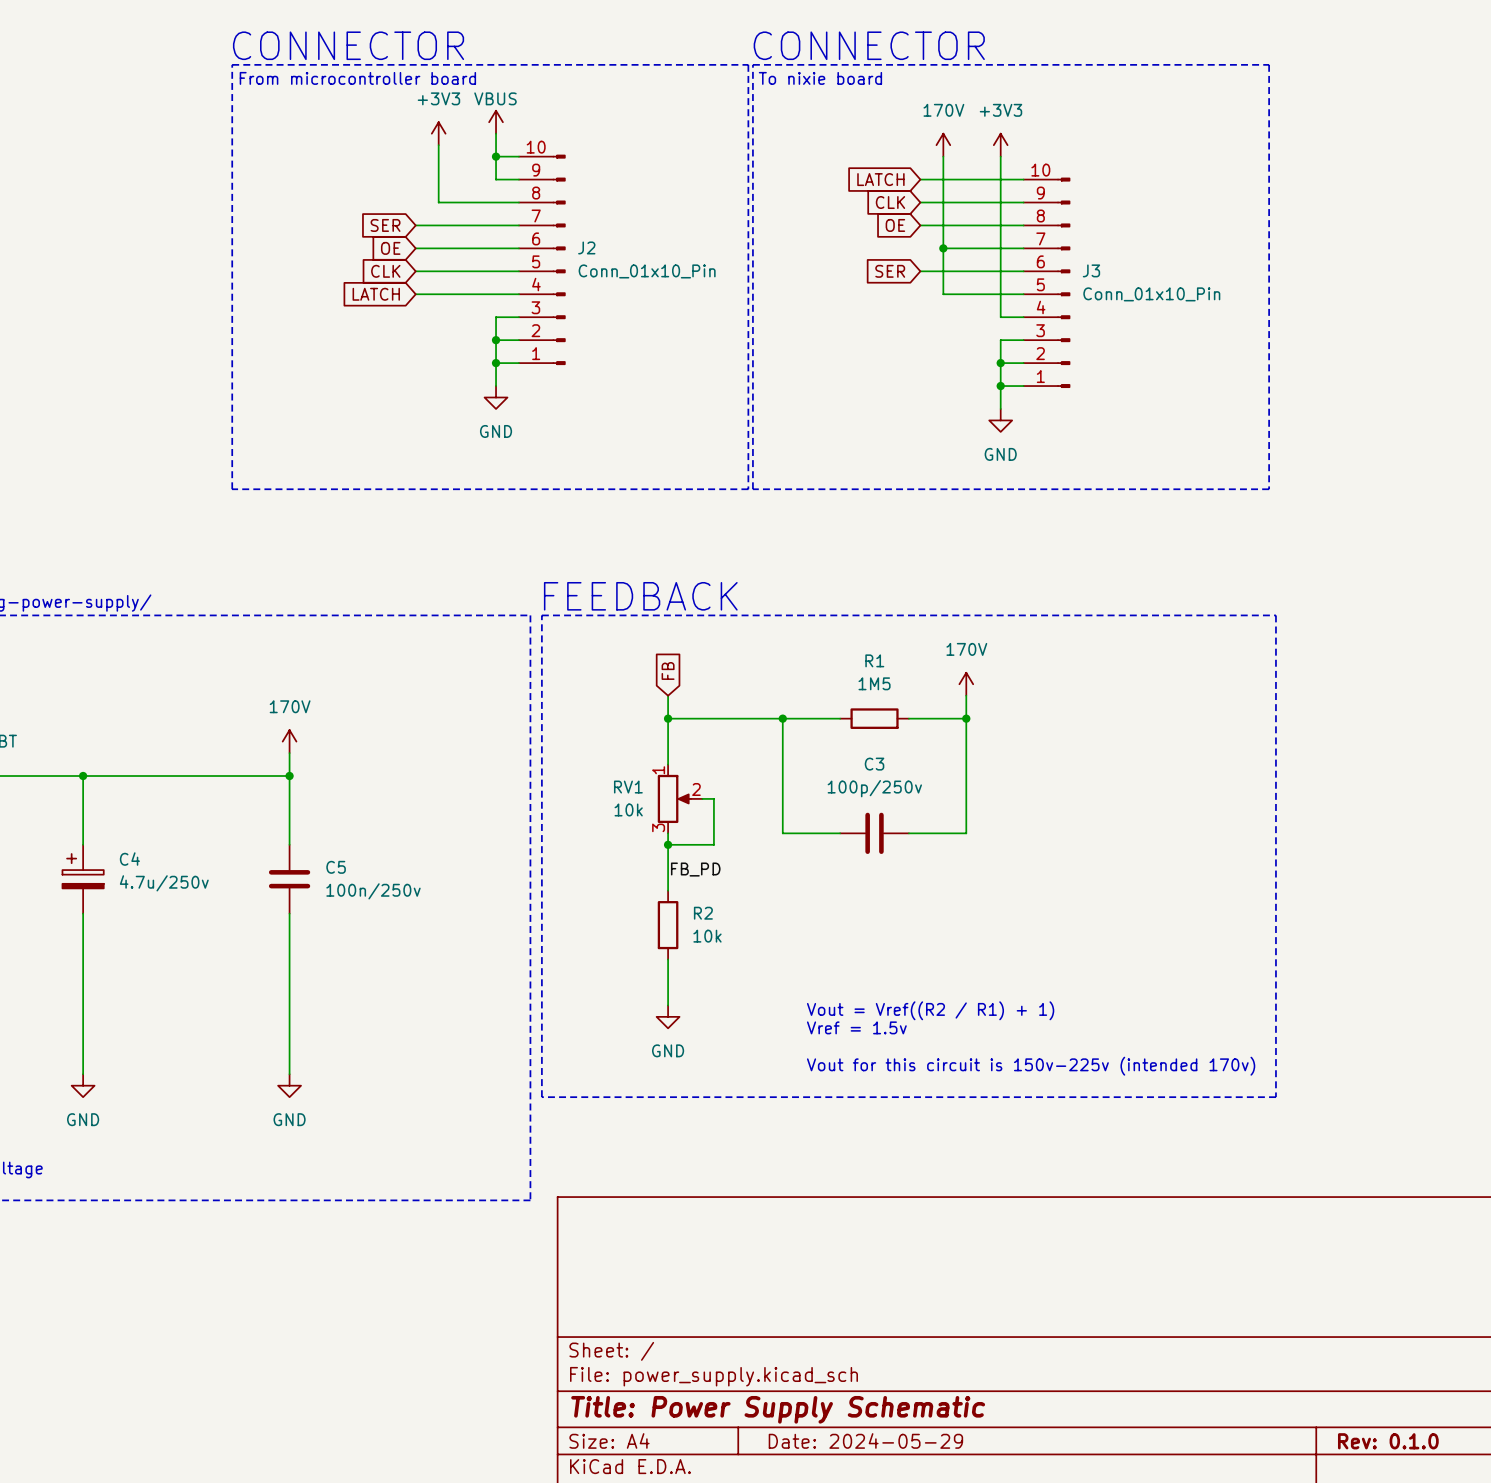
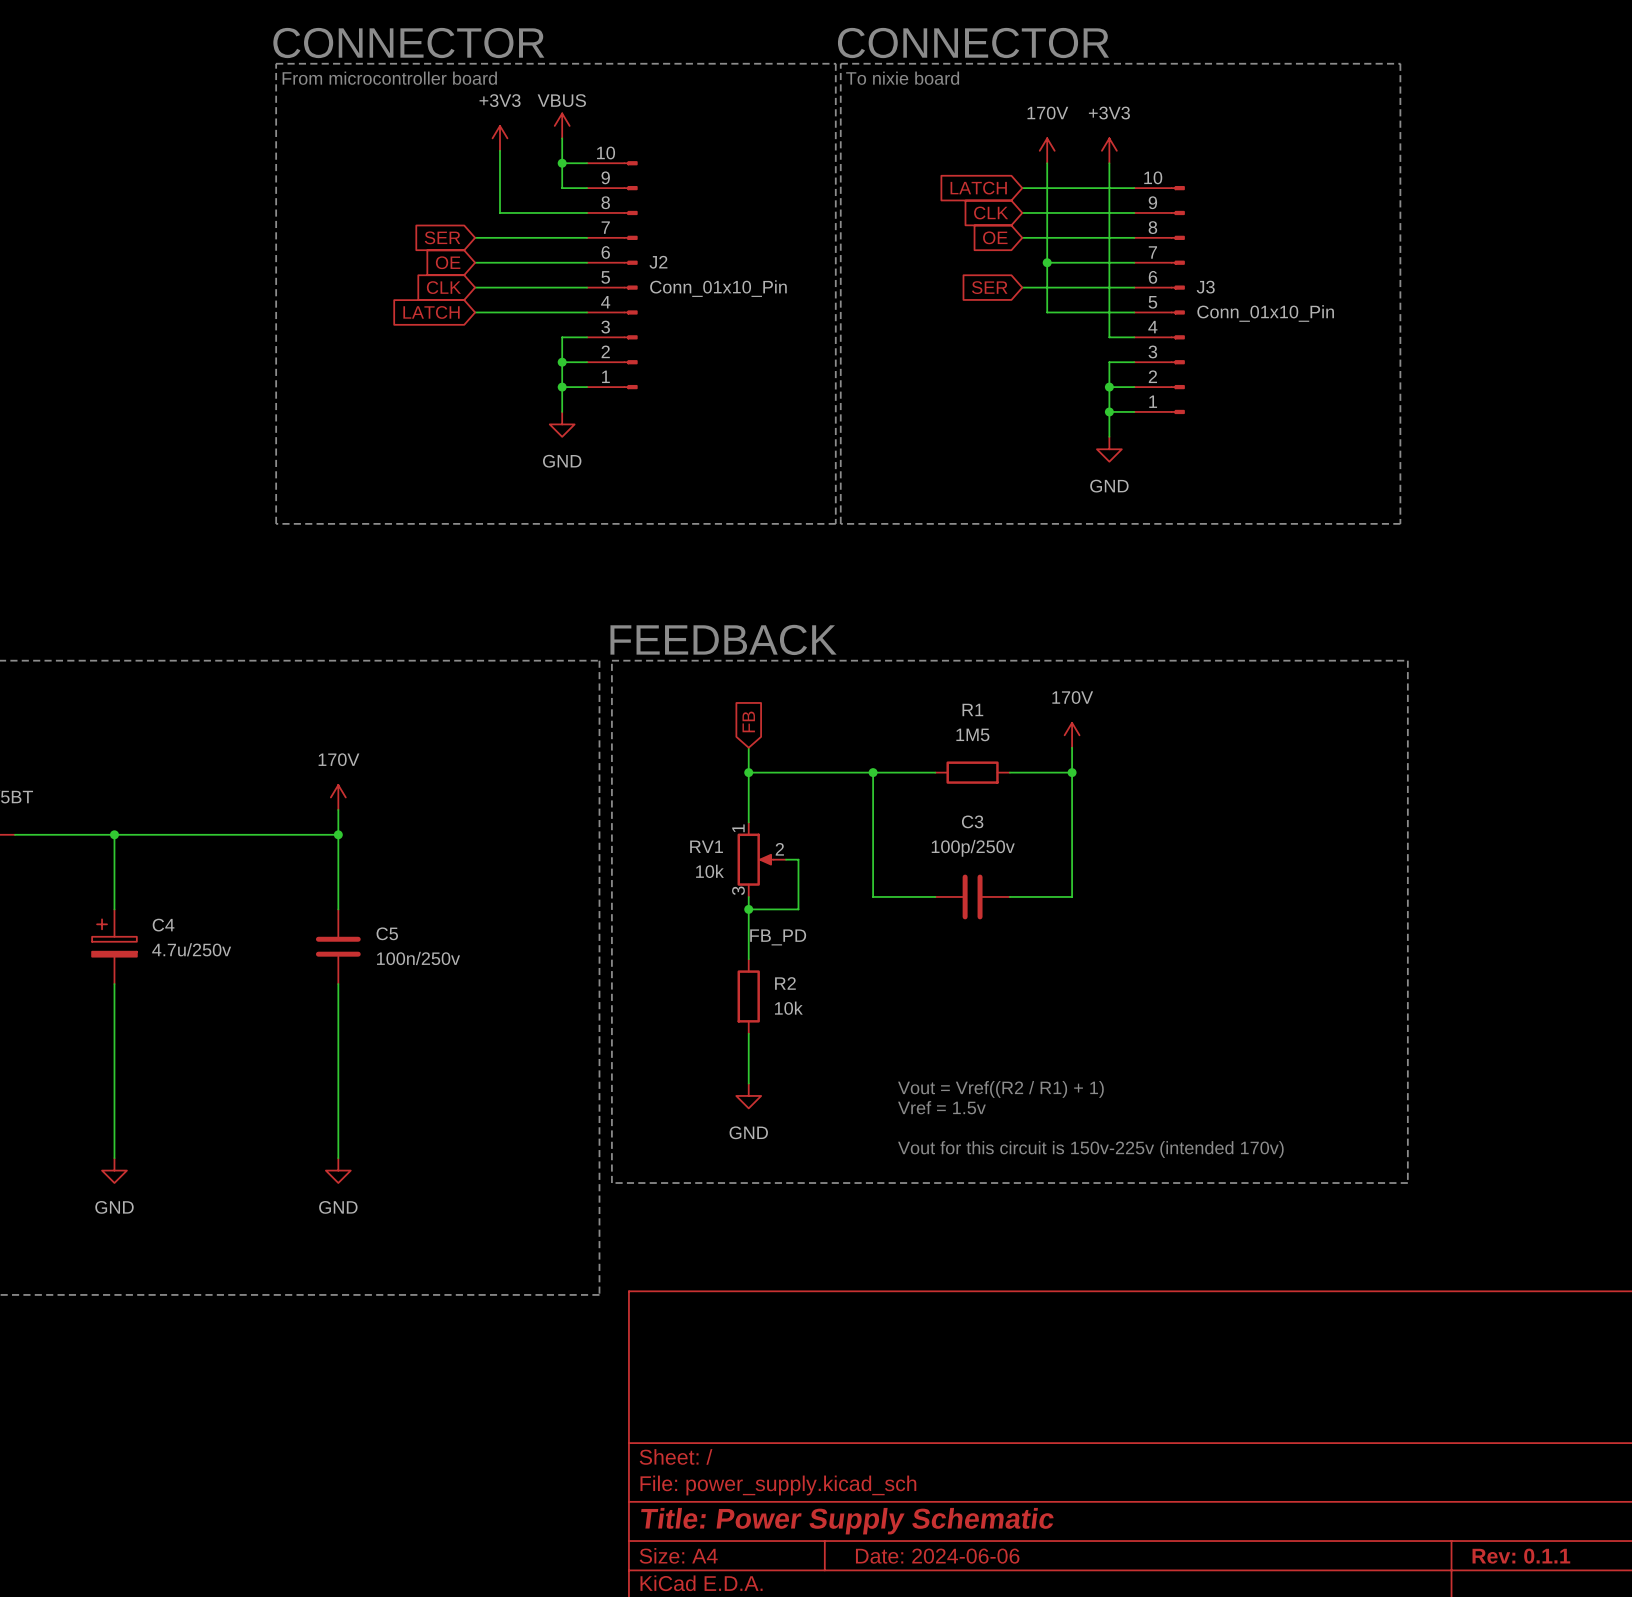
title block: Date: 2024-05-29 (865, 1440) -> Date: 2024-06-06 (937, 1556)
title block: Rev: 0.1.0 (1388, 1441) -> Rev: 0.1.1 (1521, 1556)

